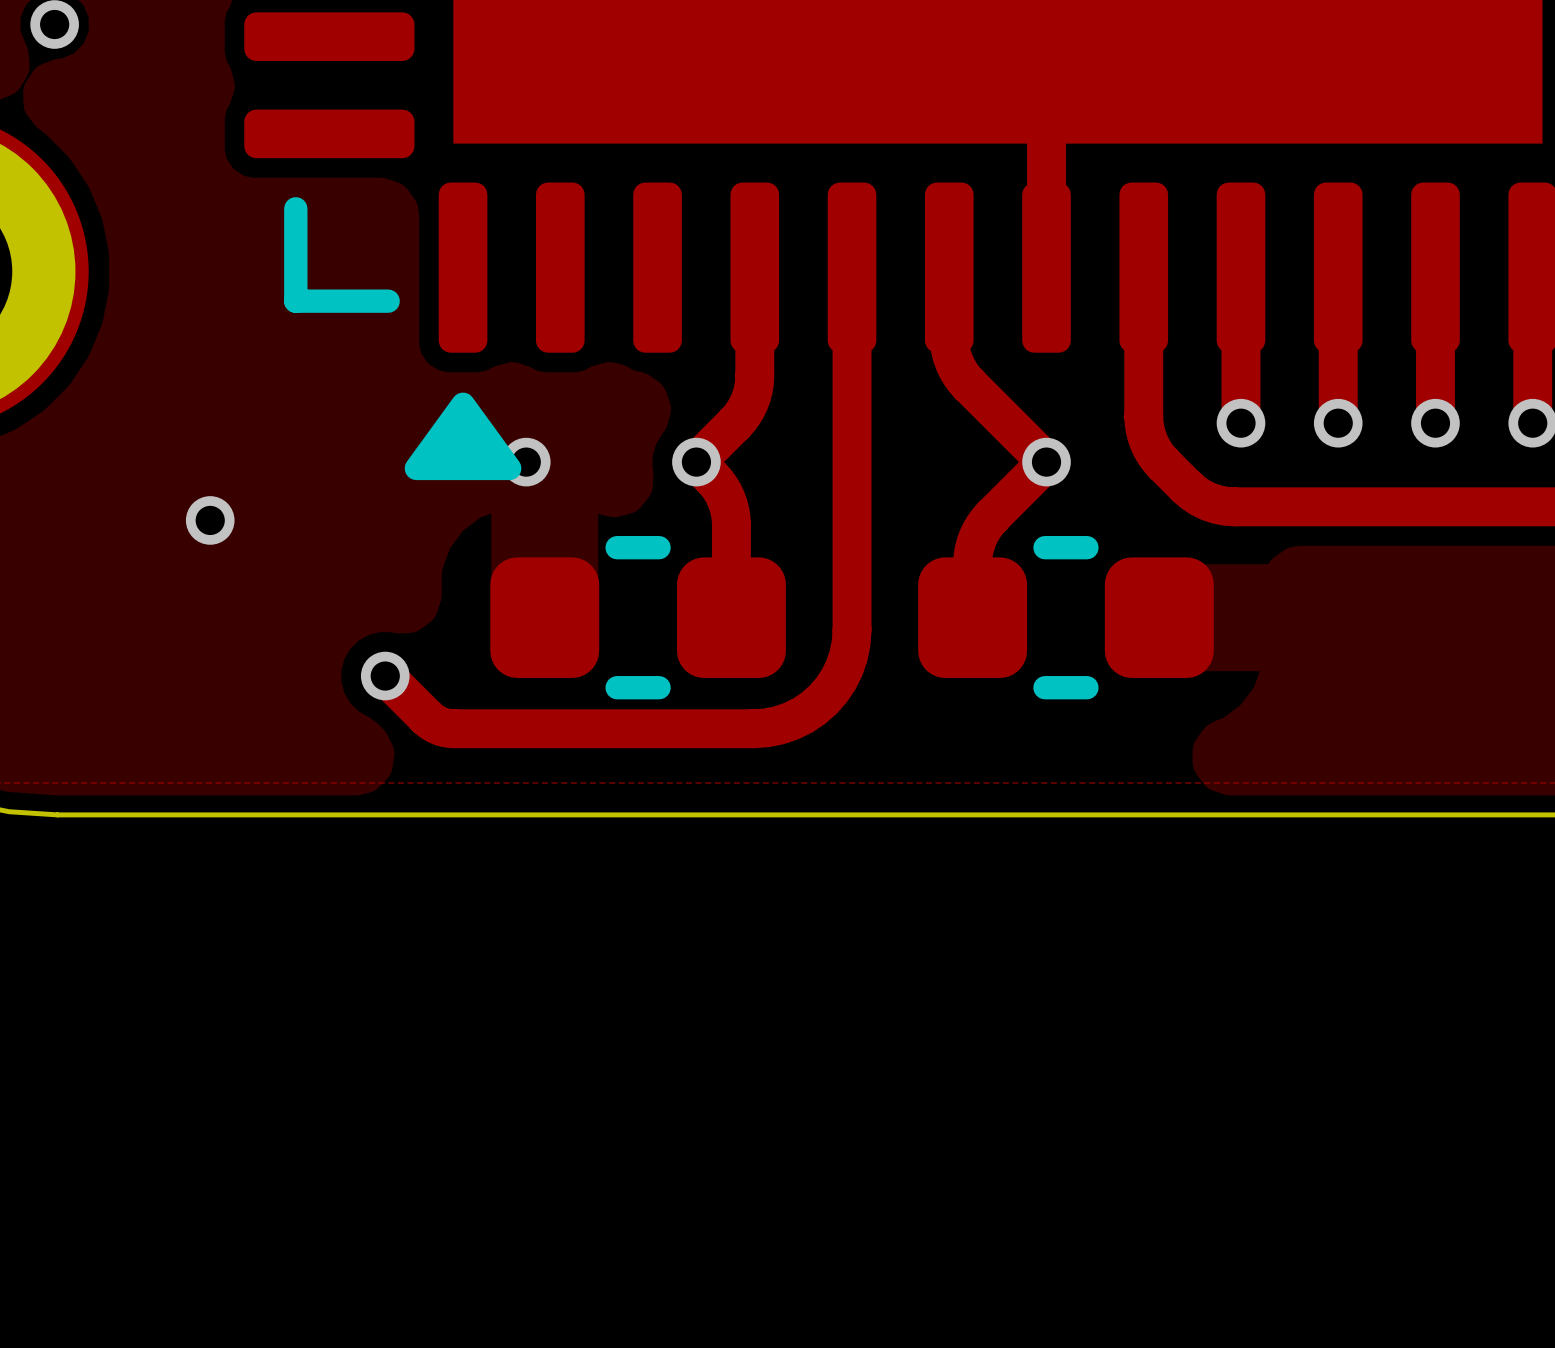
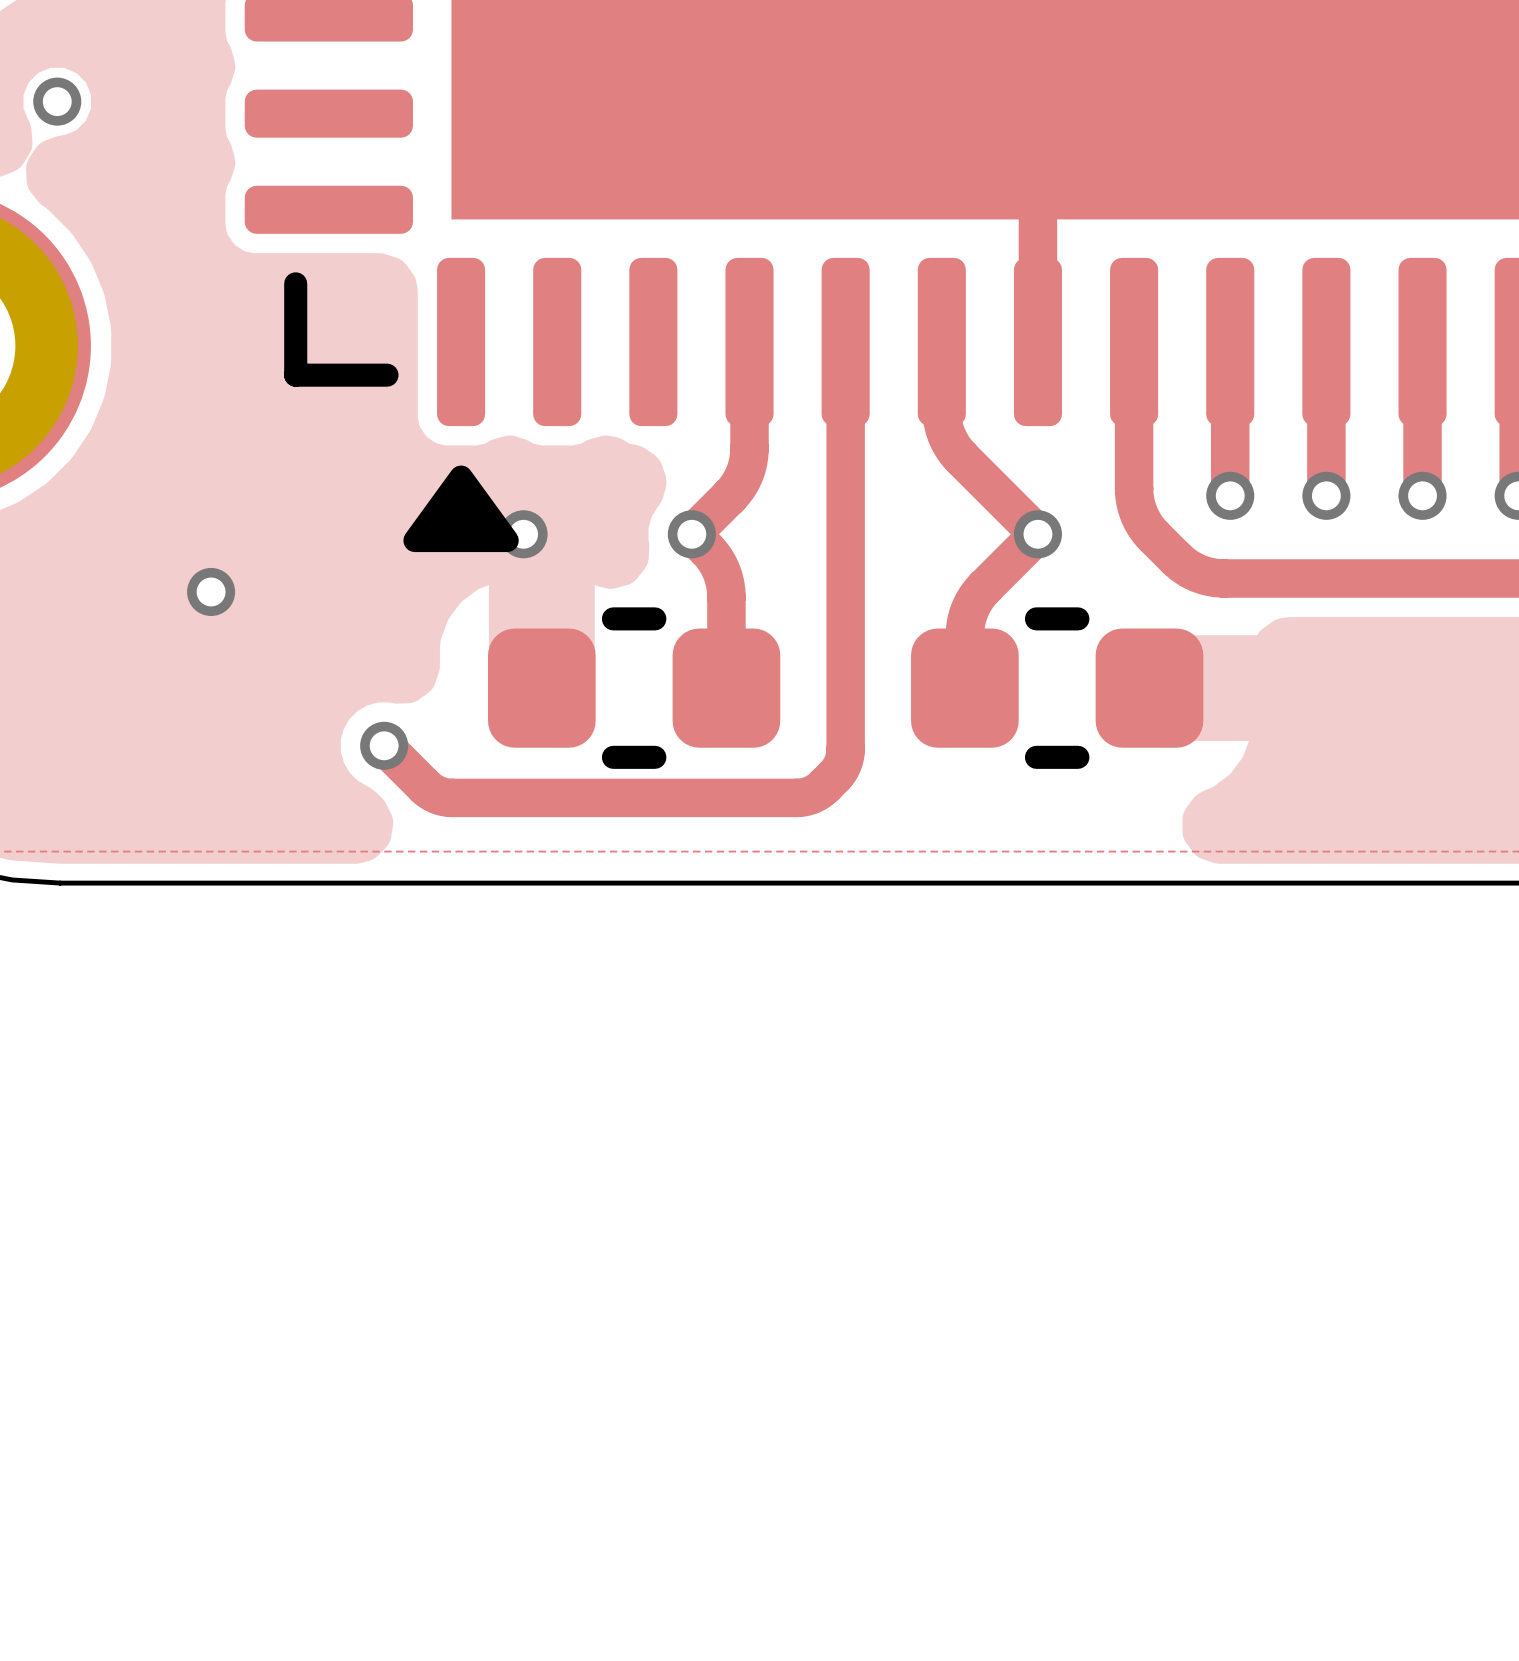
track: (852, 629) (851, 642) (844, 667) (831, 690) (823, 699) (813, 708) (791, 721) (778, 725) (753, 728) -> (845, 700) (845, 752) (841, 767) (834, 776) (820, 789) (806, 796) (747, 797)

